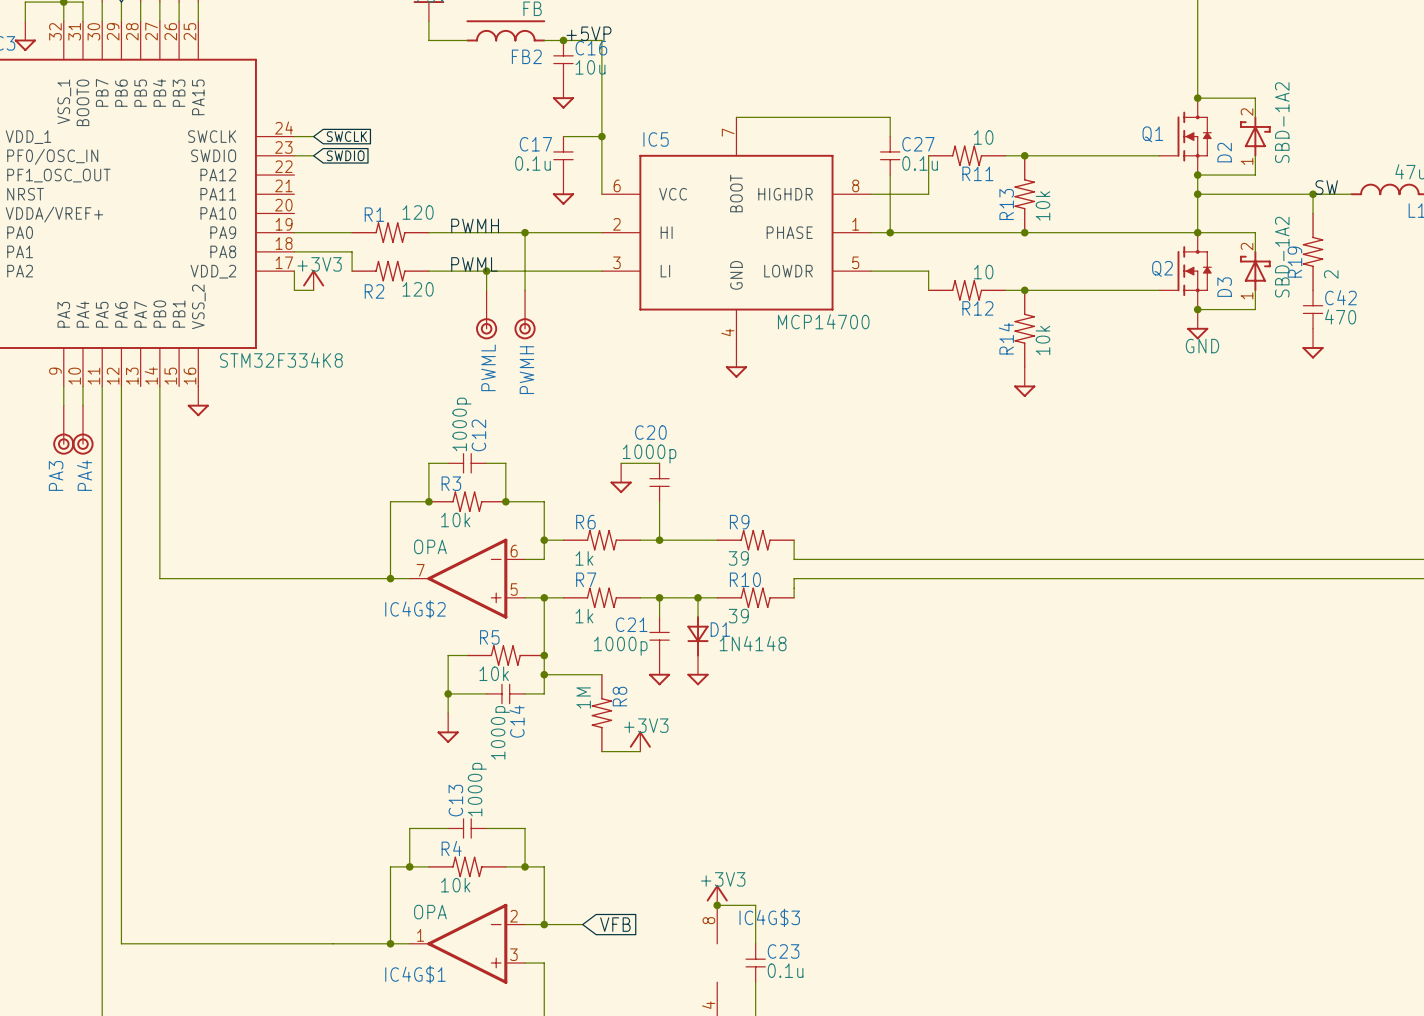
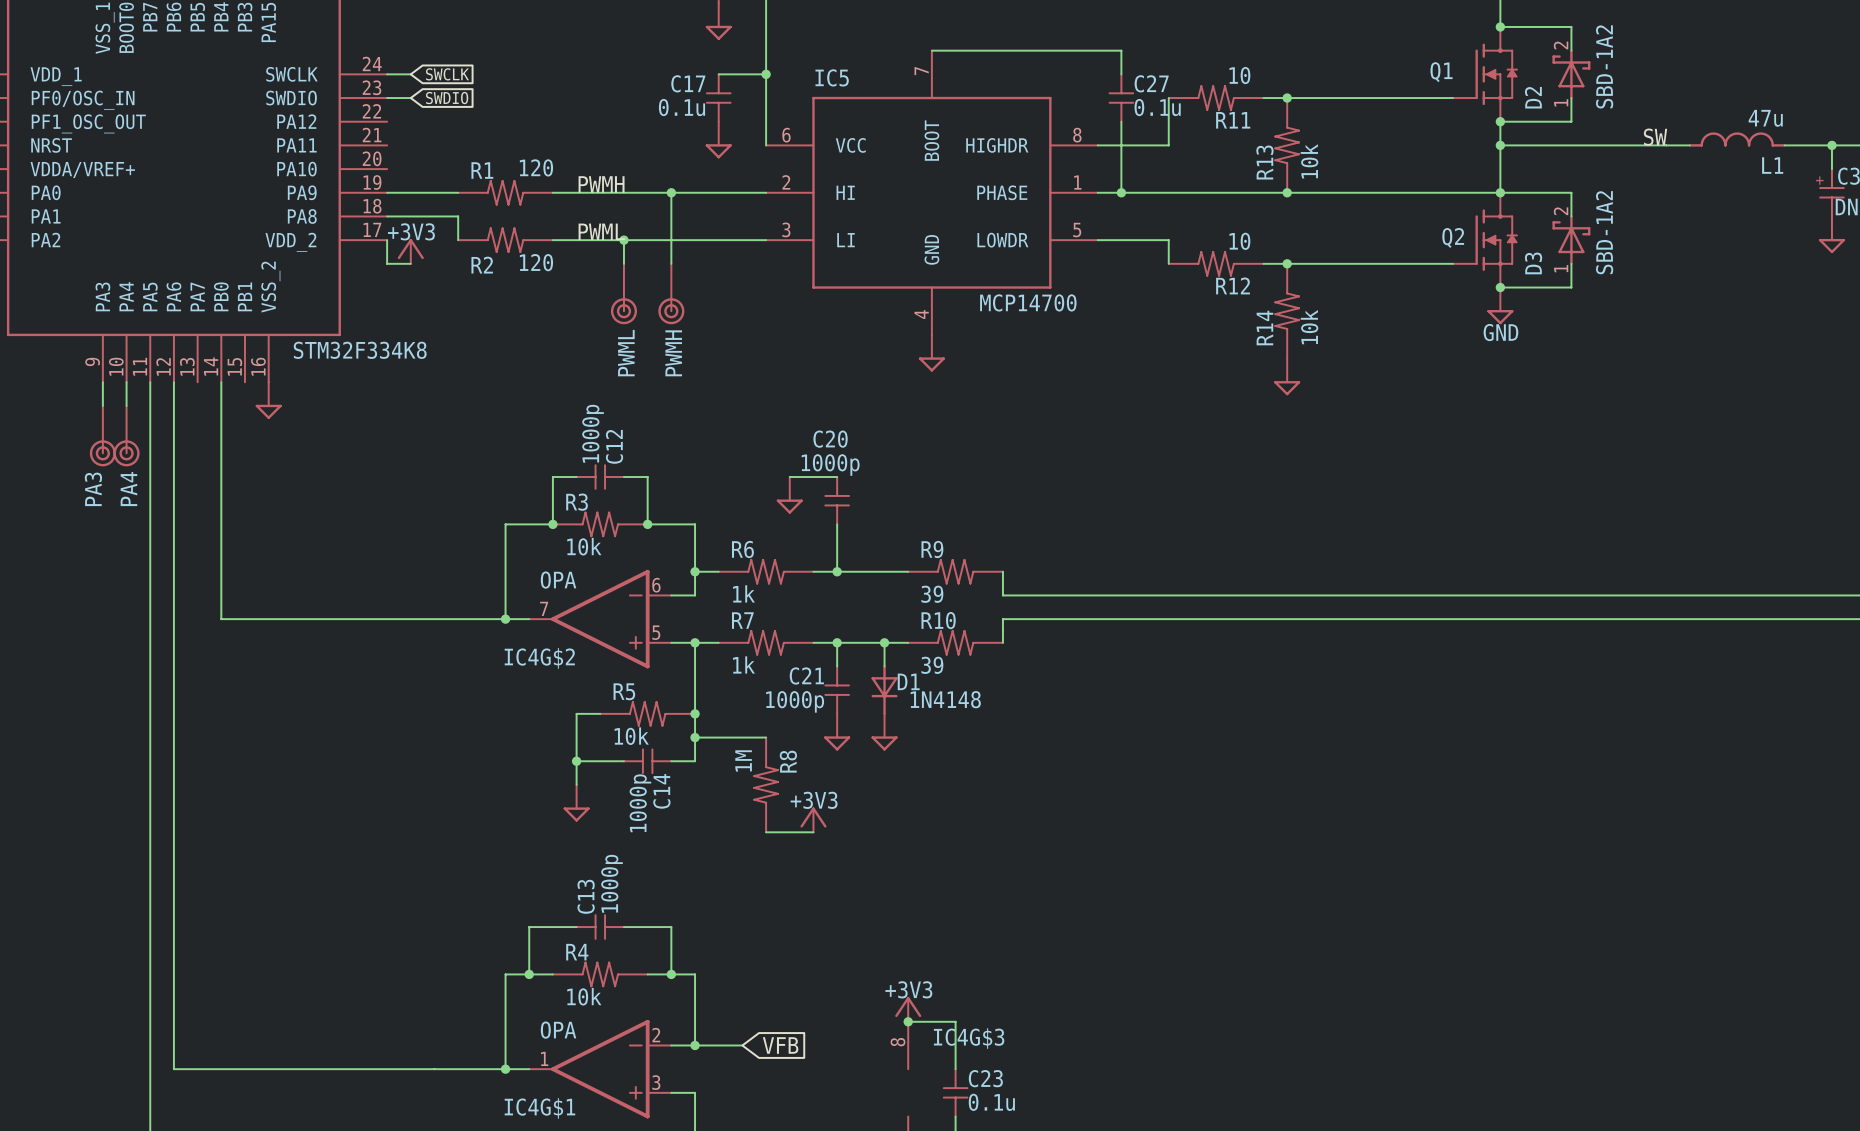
wire: (1313, 194) (1313, 213) -> none
junction: (1313, 194) -> none
R19: 2 (1313, 251) -> none
C42: 470 (1313, 309) -> none
power symbol: (1313, 343) -> none

